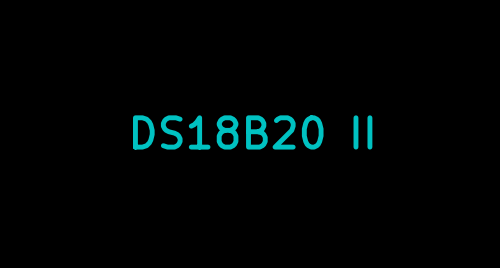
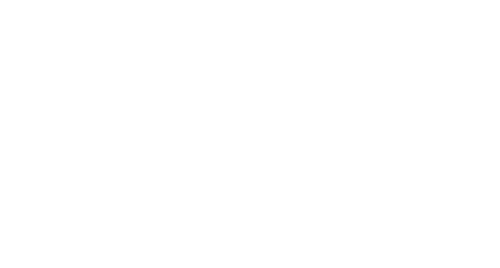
drawing: [133, 115, 373, 150] -> none

